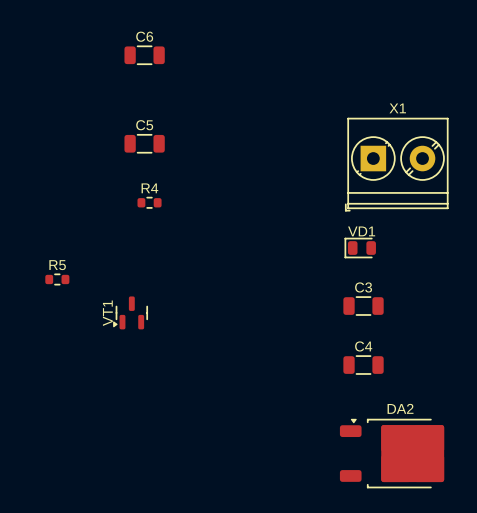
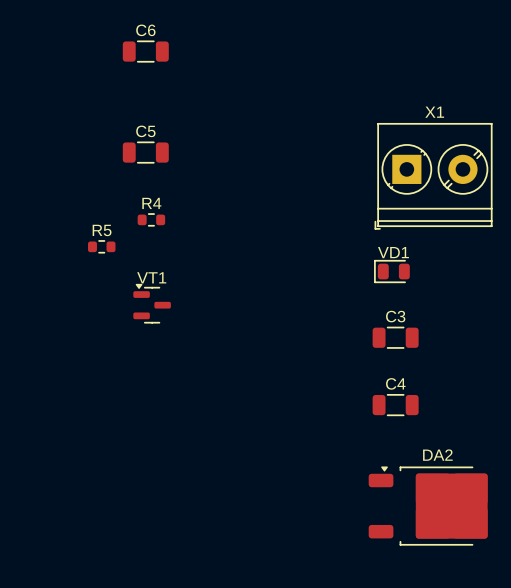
R5 position: (57, 279) -> (101, 246)
VT1 rotation: 0° (130, 312) -> 90° clockwise (152, 303)
VT1 position: (130, 312) -> (152, 303)

